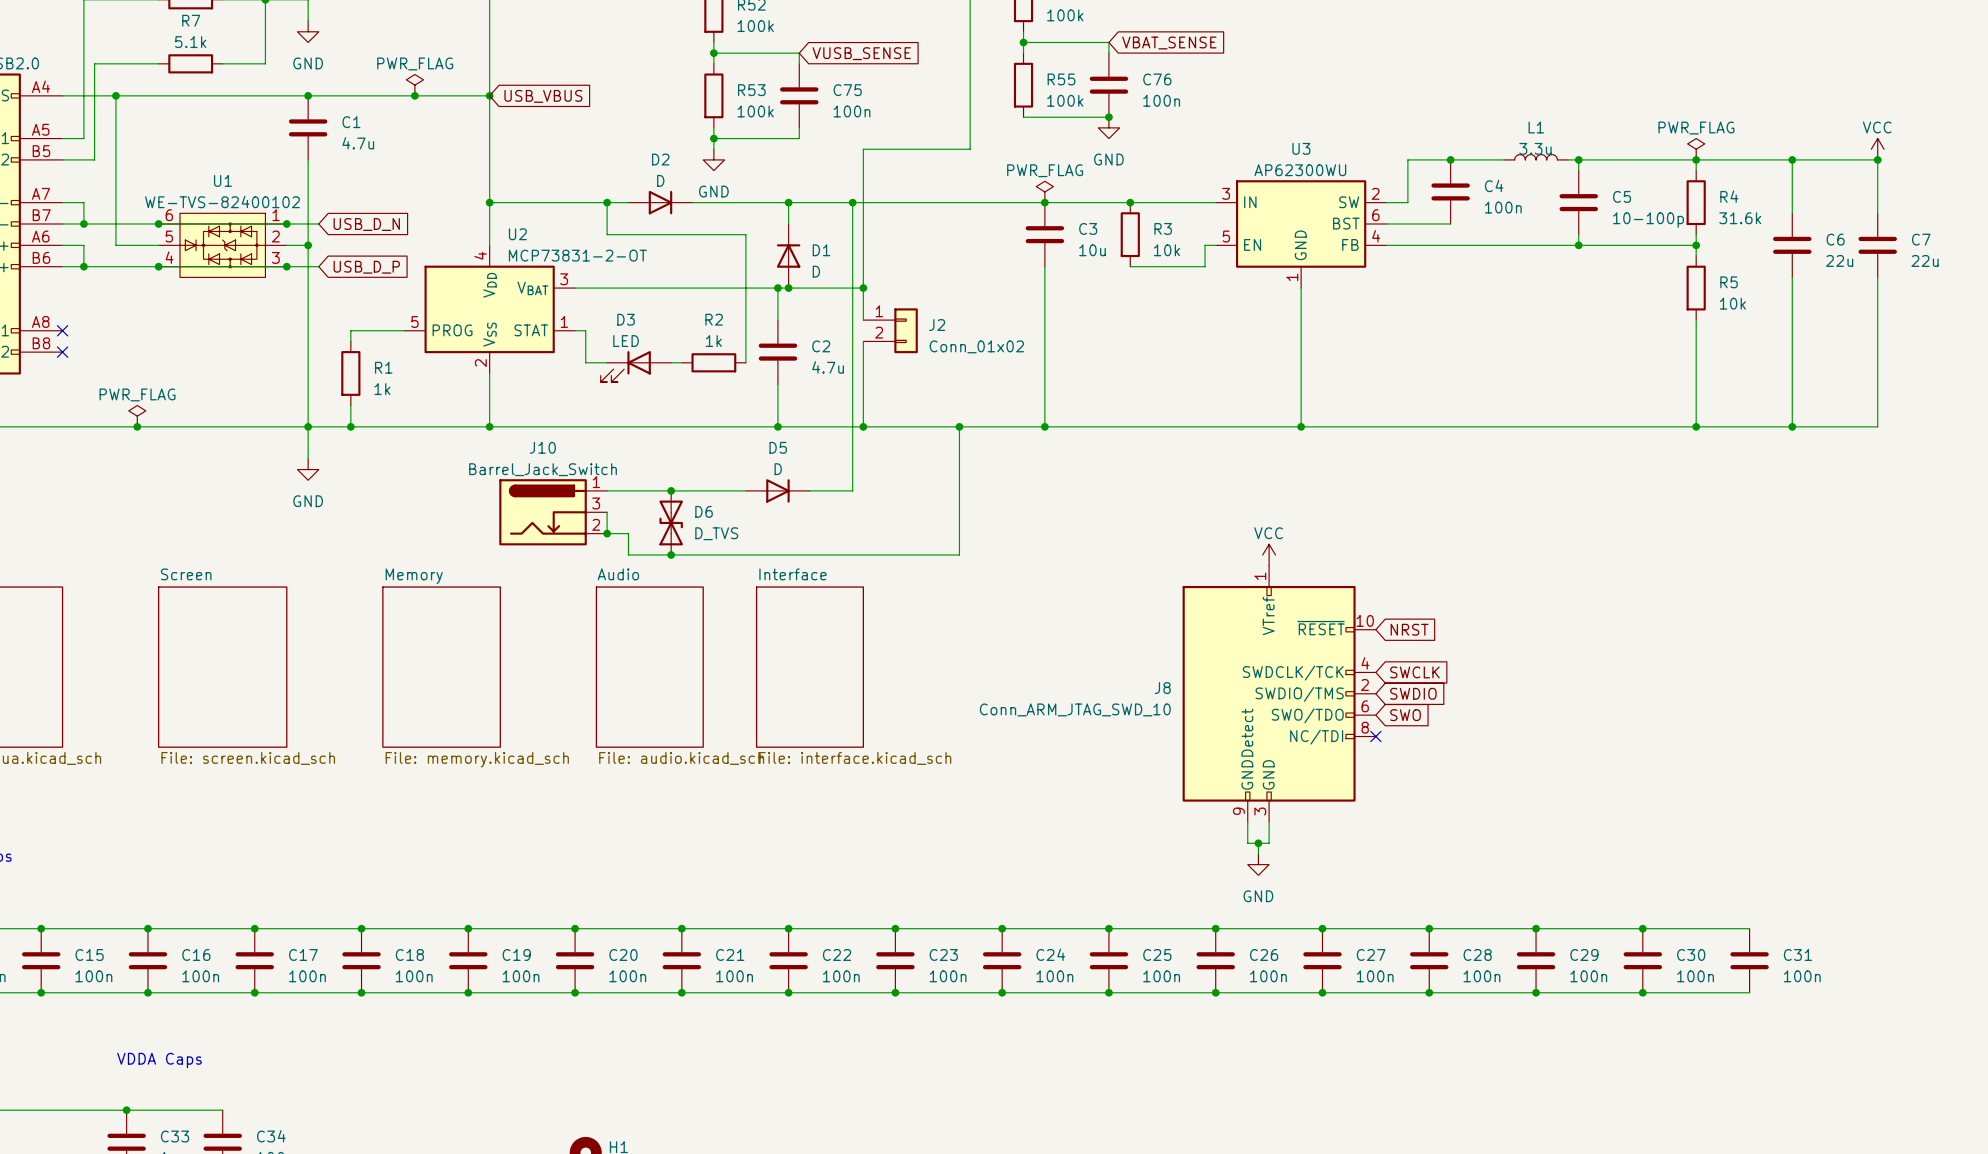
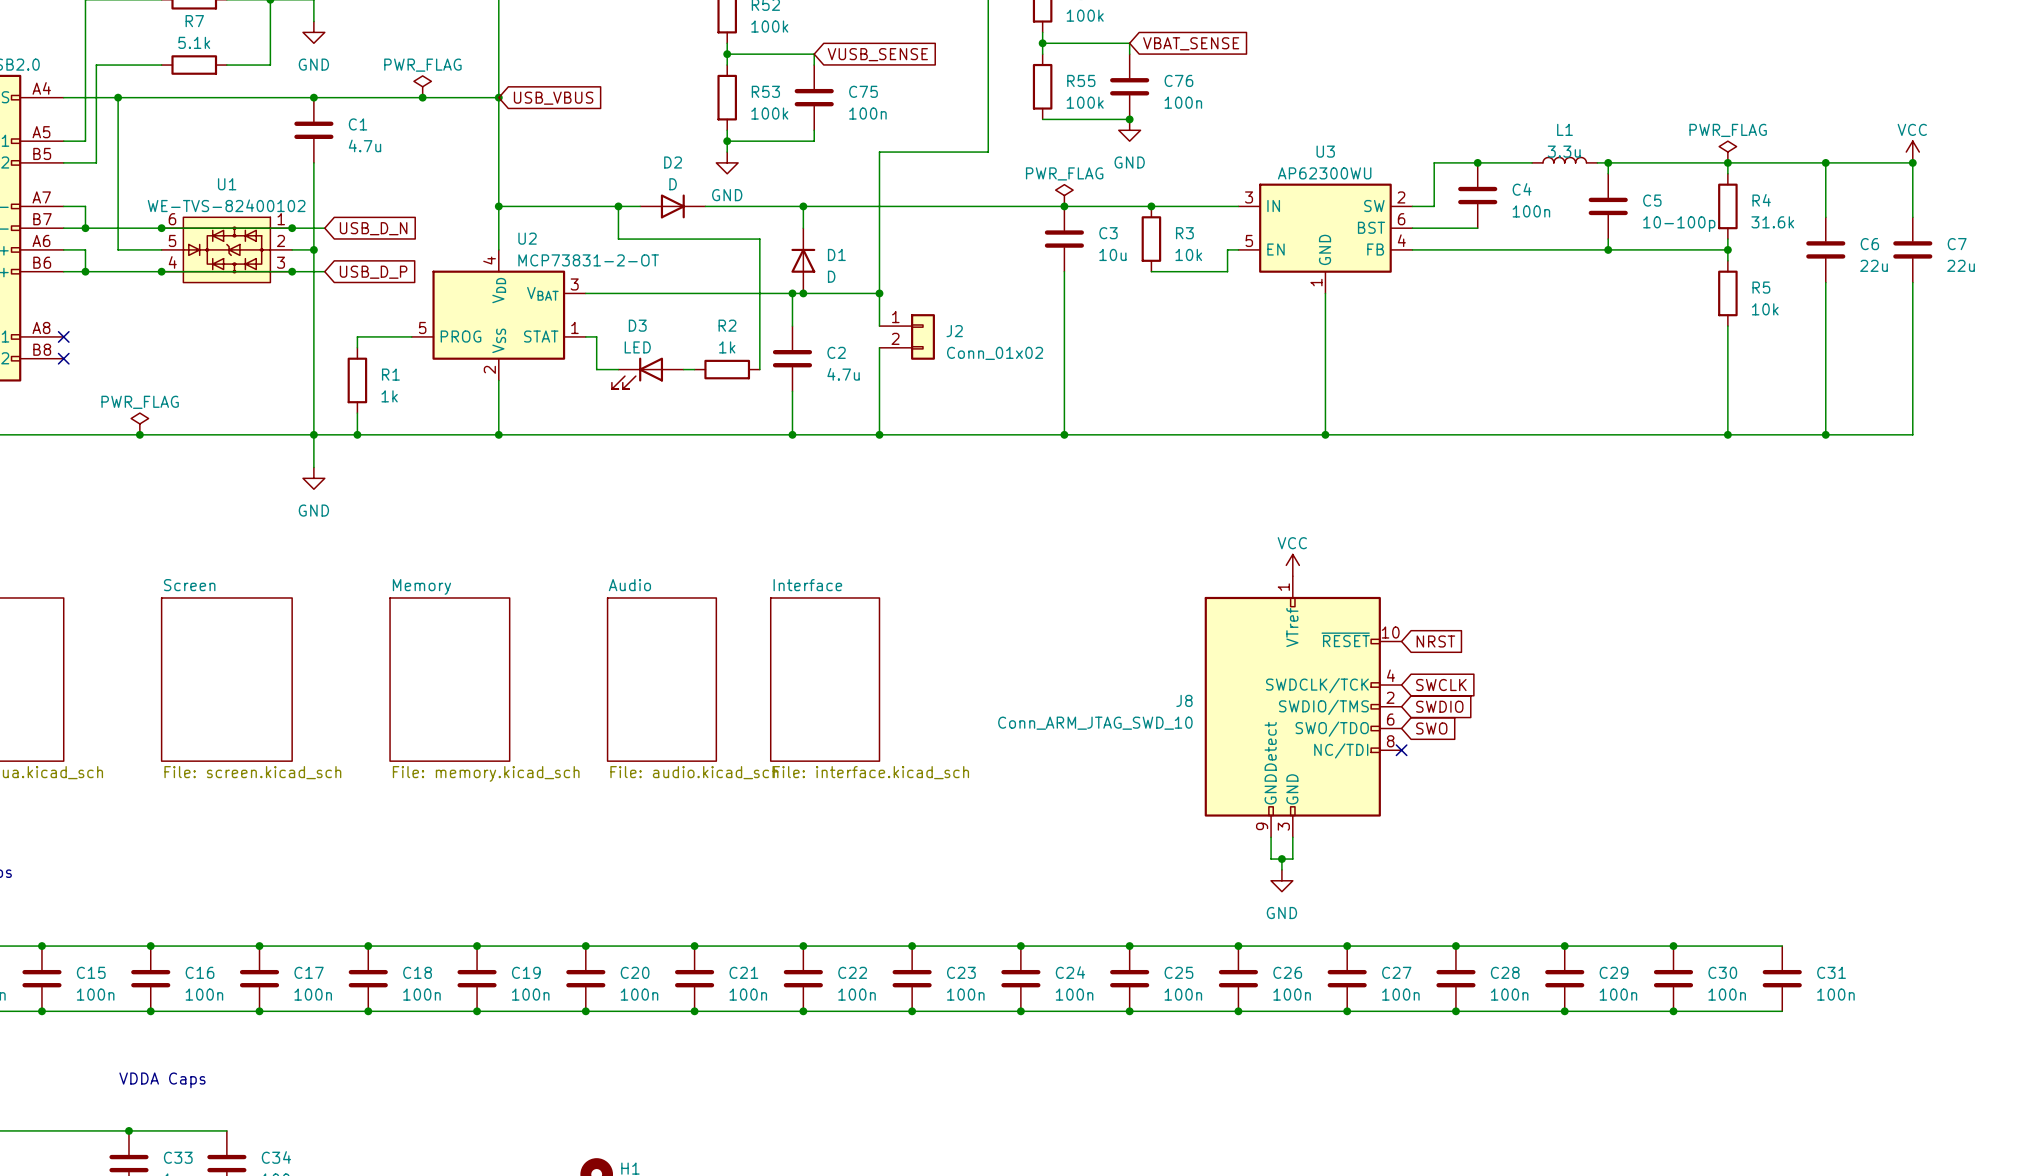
wire: (852, 202) (852, 490) (809, 490) -> none
junction: (852, 202) -> none
wire: (959, 426) (959, 554) (628, 554) (628, 533) (607, 533) (607, 512) -> none
junction: (959, 426) -> none
wire: (607, 490) (745, 490) -> none
junction: (671, 490) -> none
D5: D (777, 490) -> none
J10: Barrel_Jack_Switch (553, 512) -> none
D6: D_TVS (671, 522) -> none
junction: (607, 533) -> none
junction: (671, 554) -> none

